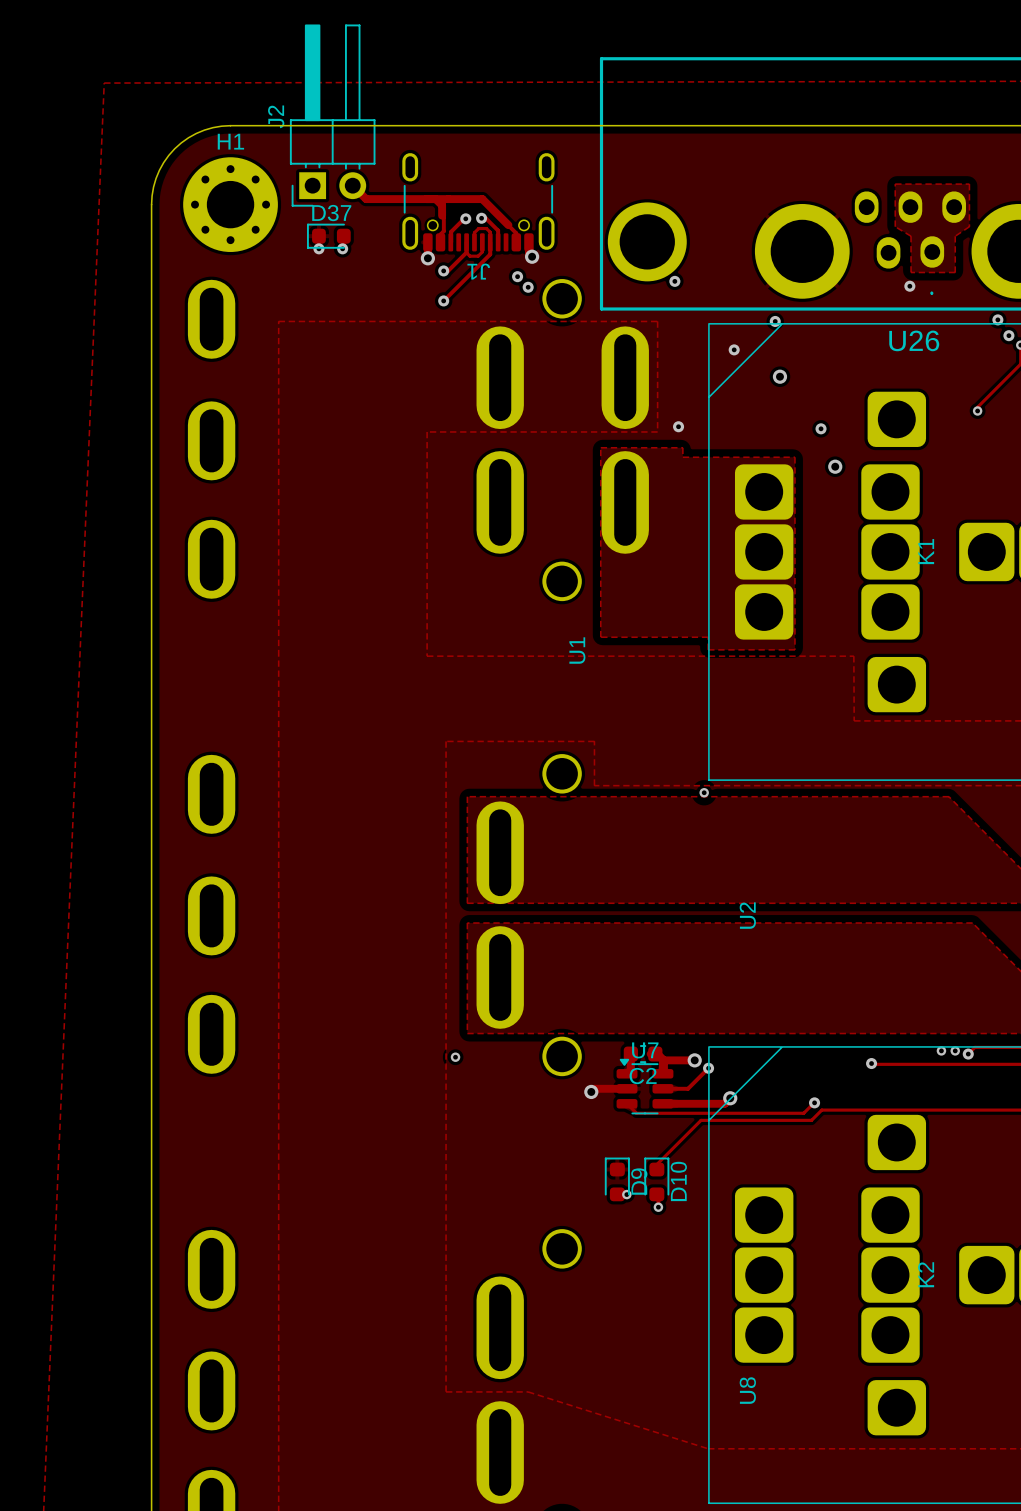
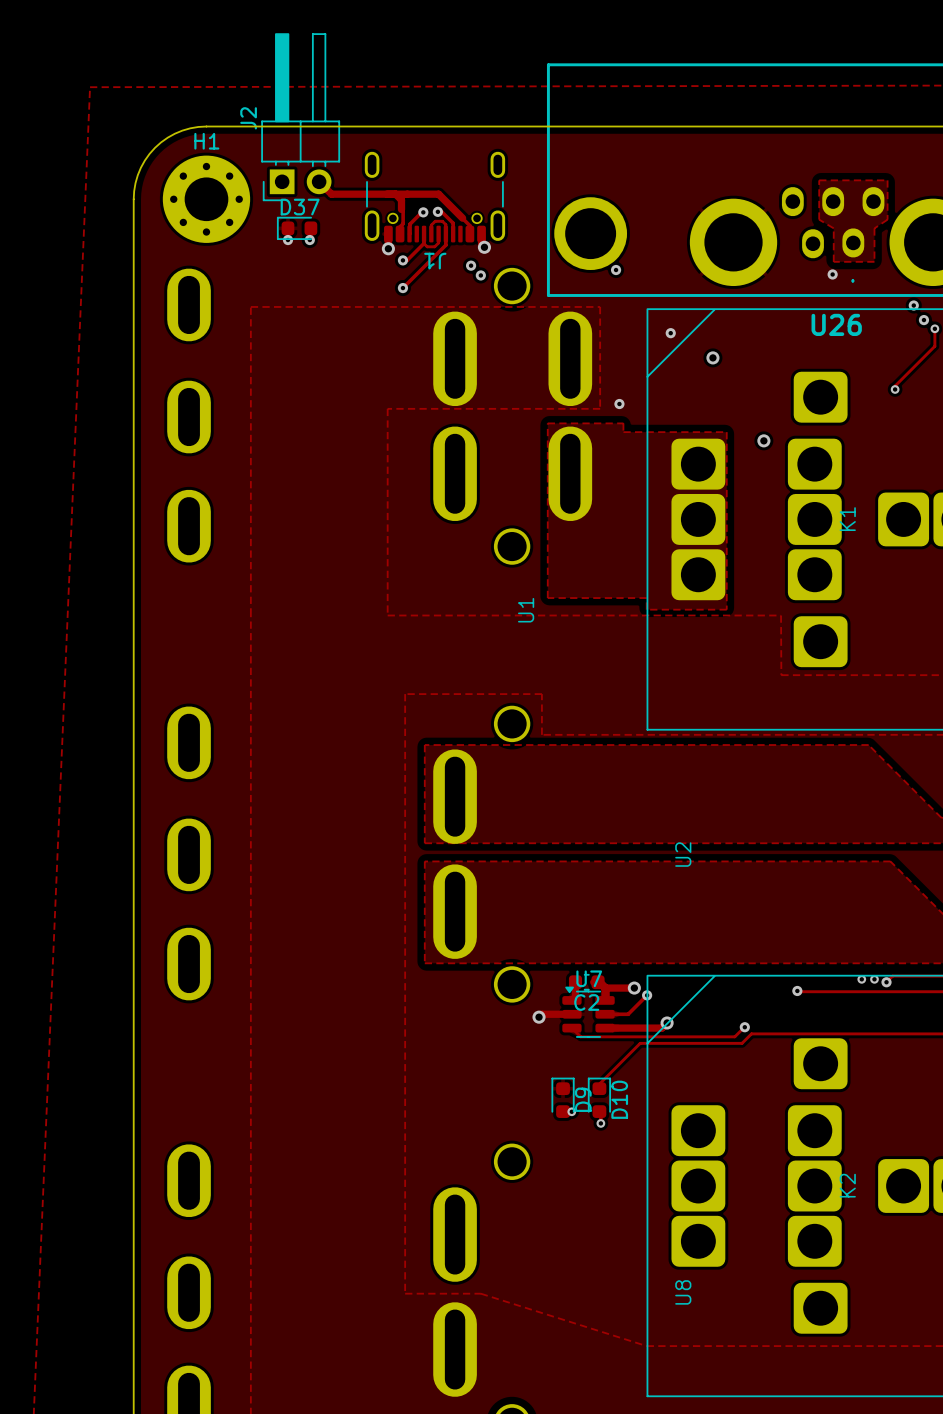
via: (775, 321) -> none
via: (821, 428) -> none
via: (704, 792) -> none
via: (455, 1057) -> none

